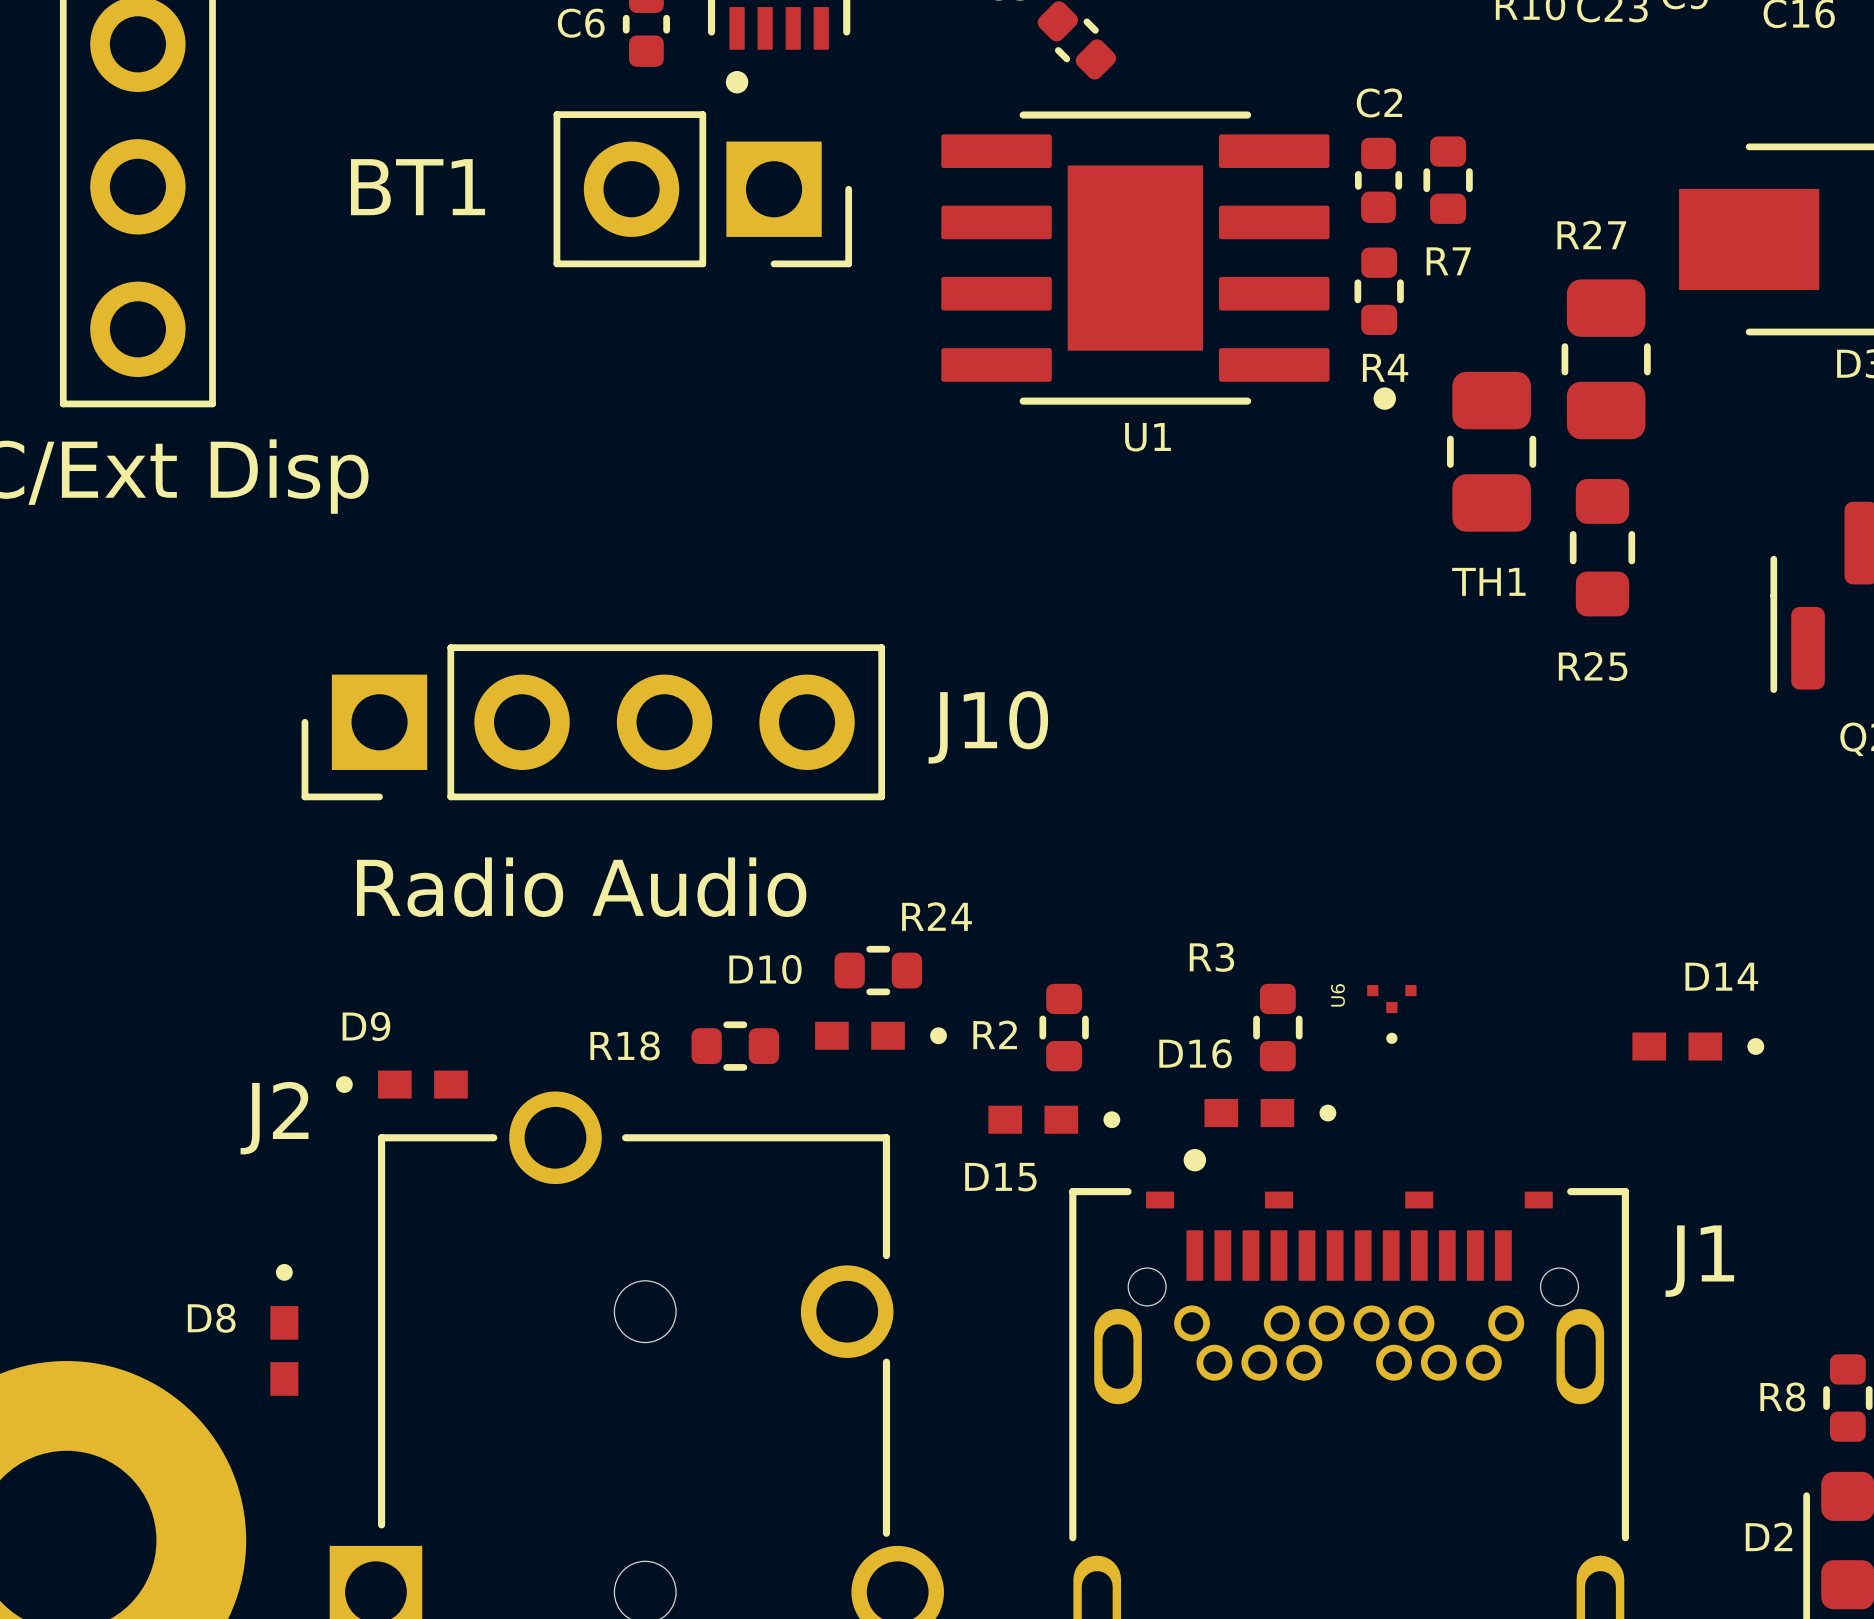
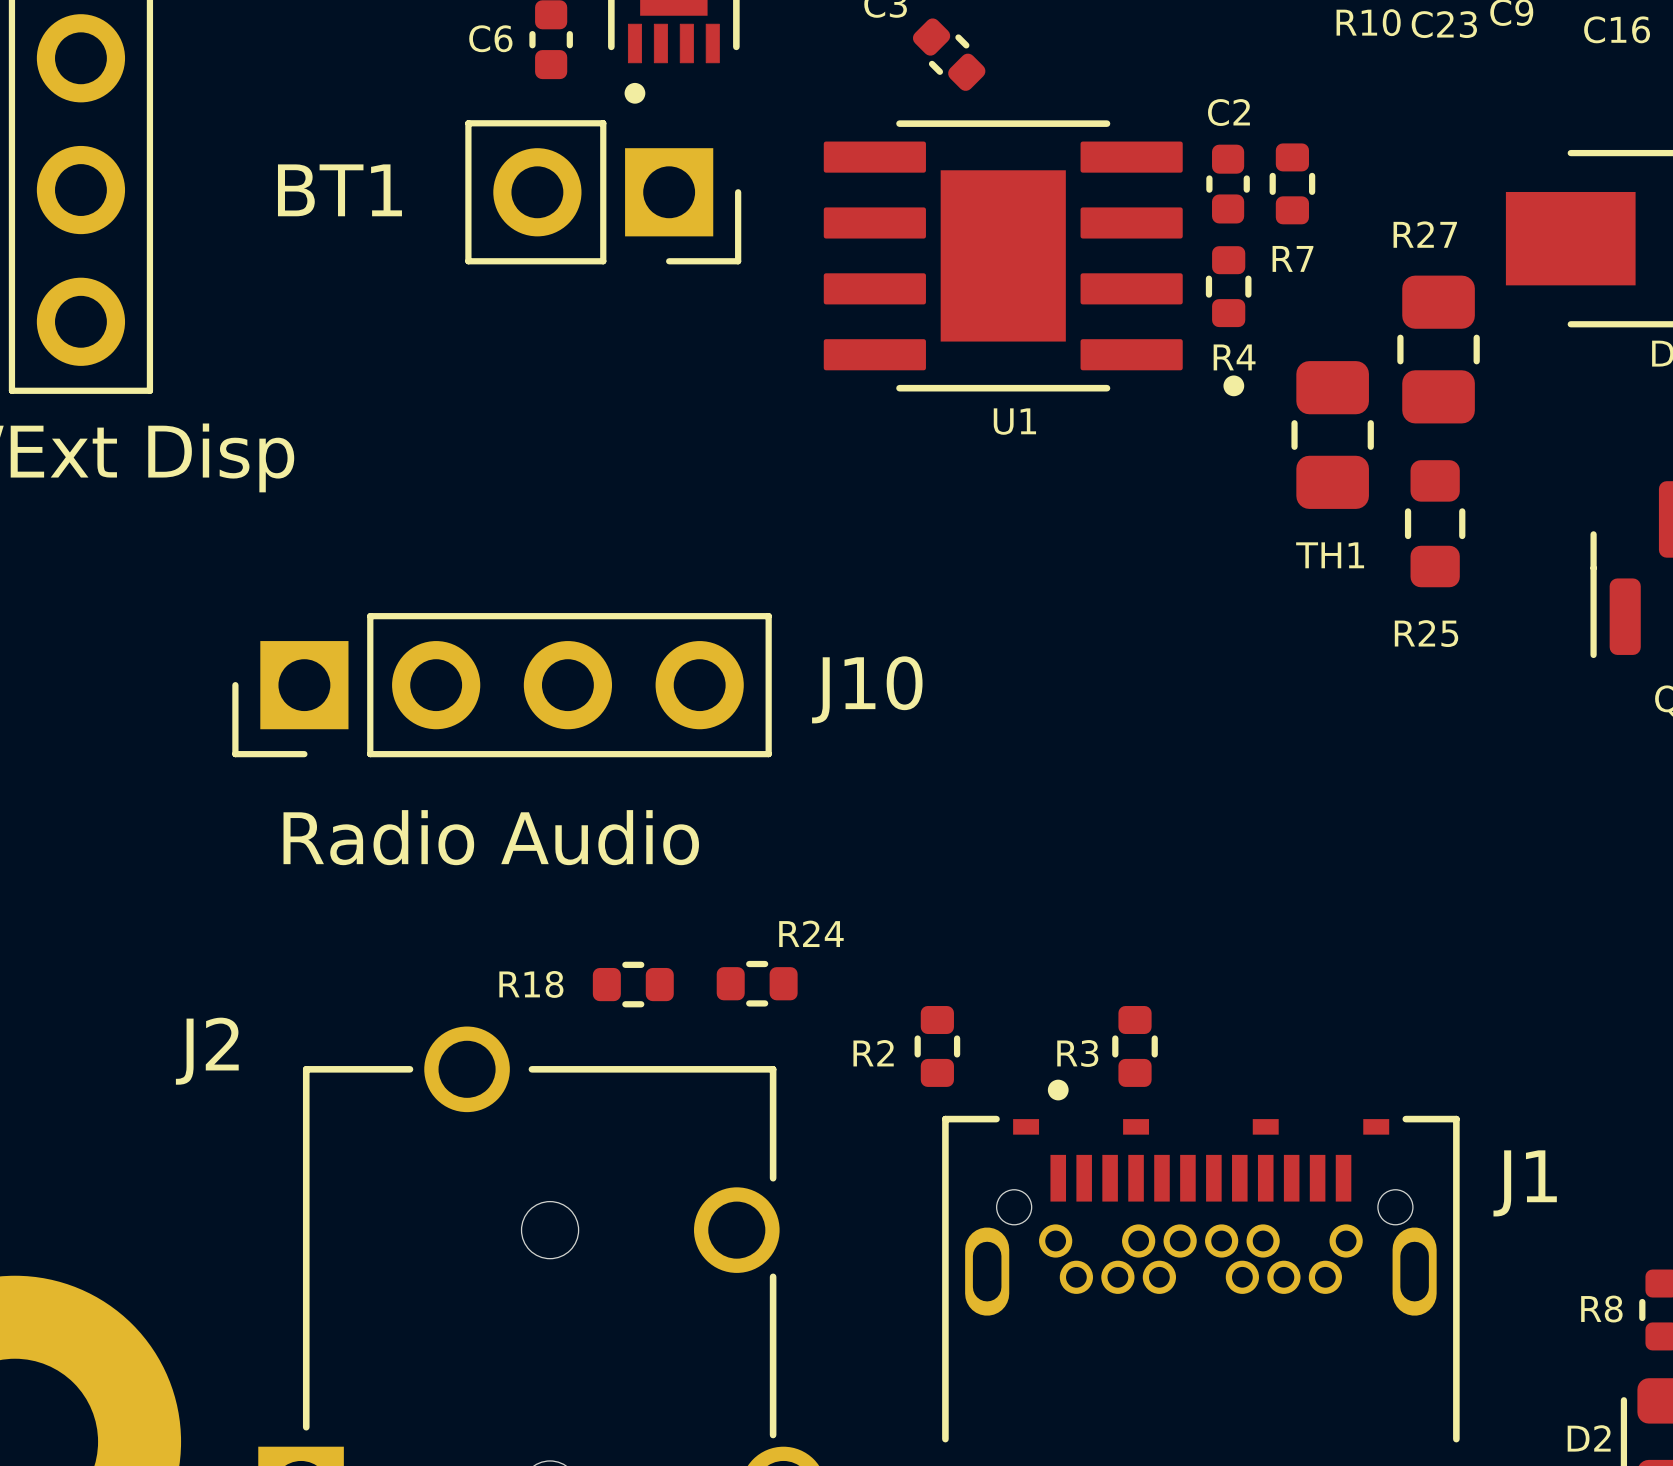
R3 name position: R3 (1211, 957) -> R3 (1077, 1053)
R24 position: (878, 970) -> (757, 983)
U6: (1391, 1014) -> none
R2 position: (1064, 1027) -> (937, 1046)
R3 position: (1277, 1027) -> (1135, 1046)
D10: (881, 1035) -> none
D14: (1698, 1046) -> none
D9: (401, 1084) -> none
D16: (1270, 1113) -> none
D15: (1054, 1119) -> none
D8: (284, 1329) -> none

